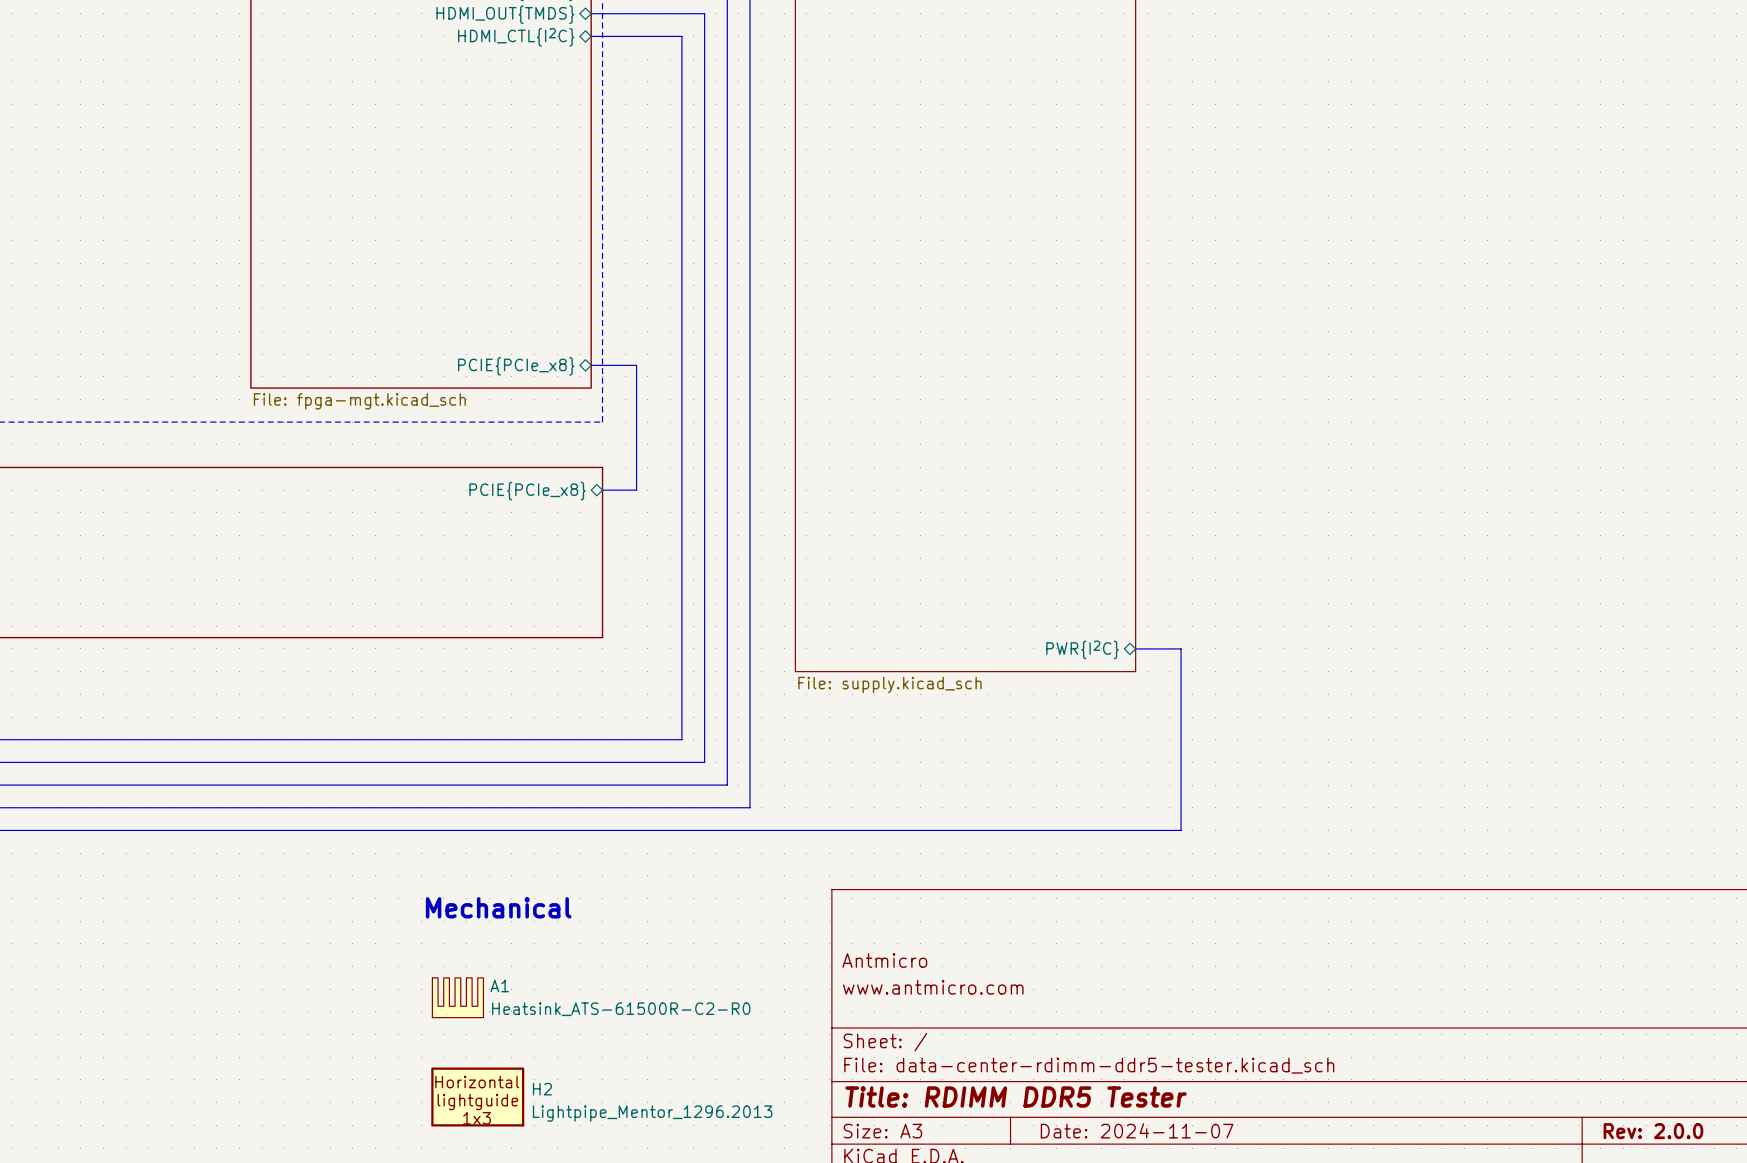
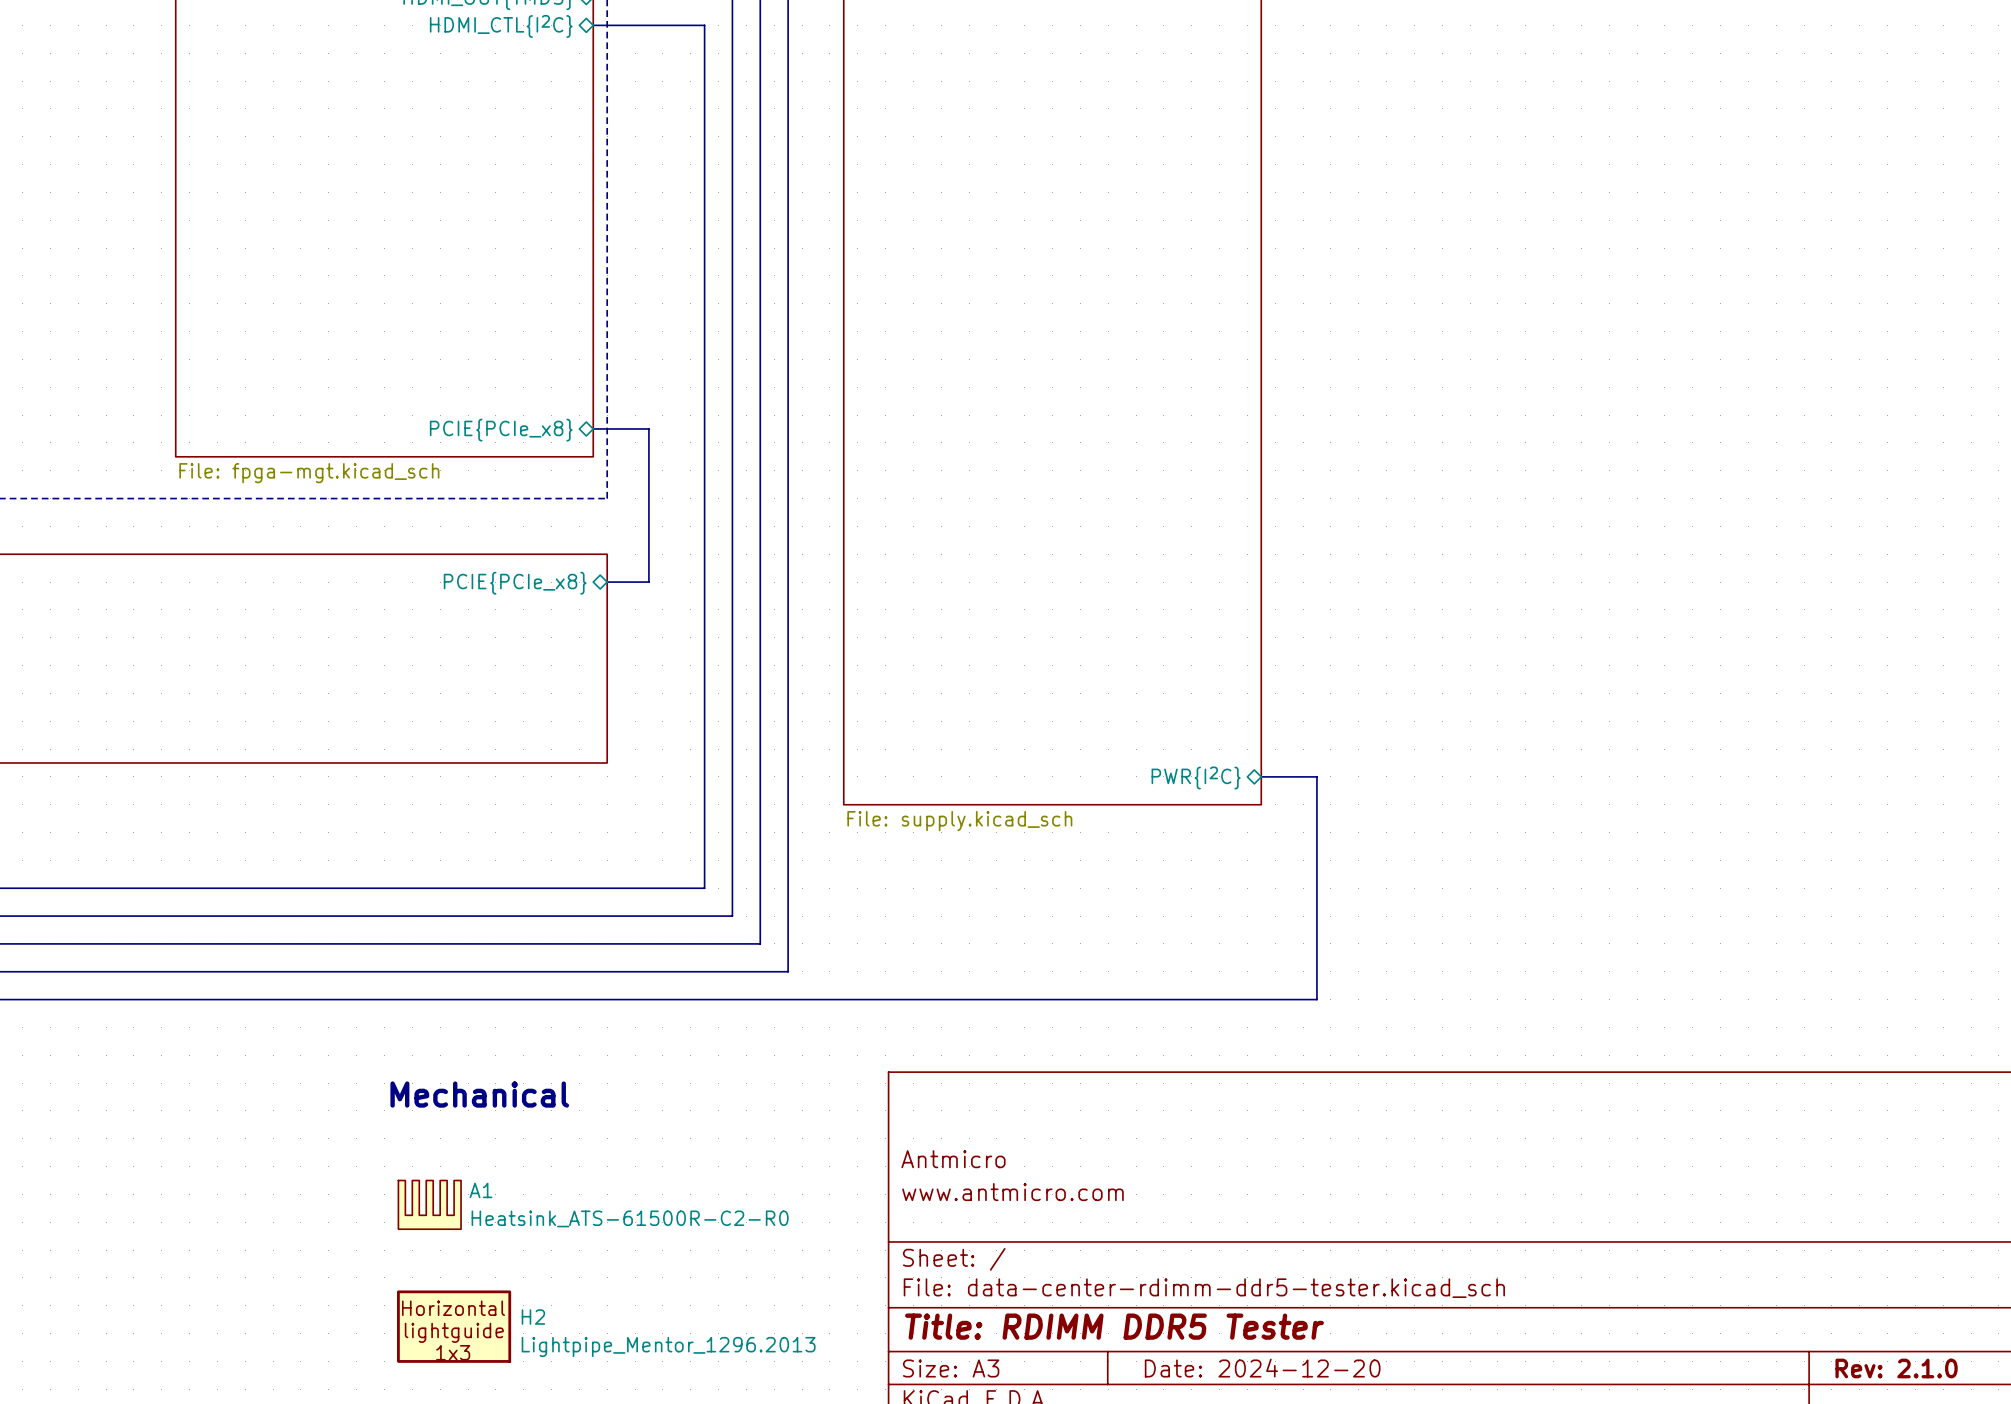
title block: Date: 2024-11-07 (1137, 1130) -> Date: 2024-12-20 (1262, 1368)
title block: Rev: 2.0.0 (1653, 1131) -> Rev: 2.1.0 (1896, 1368)

